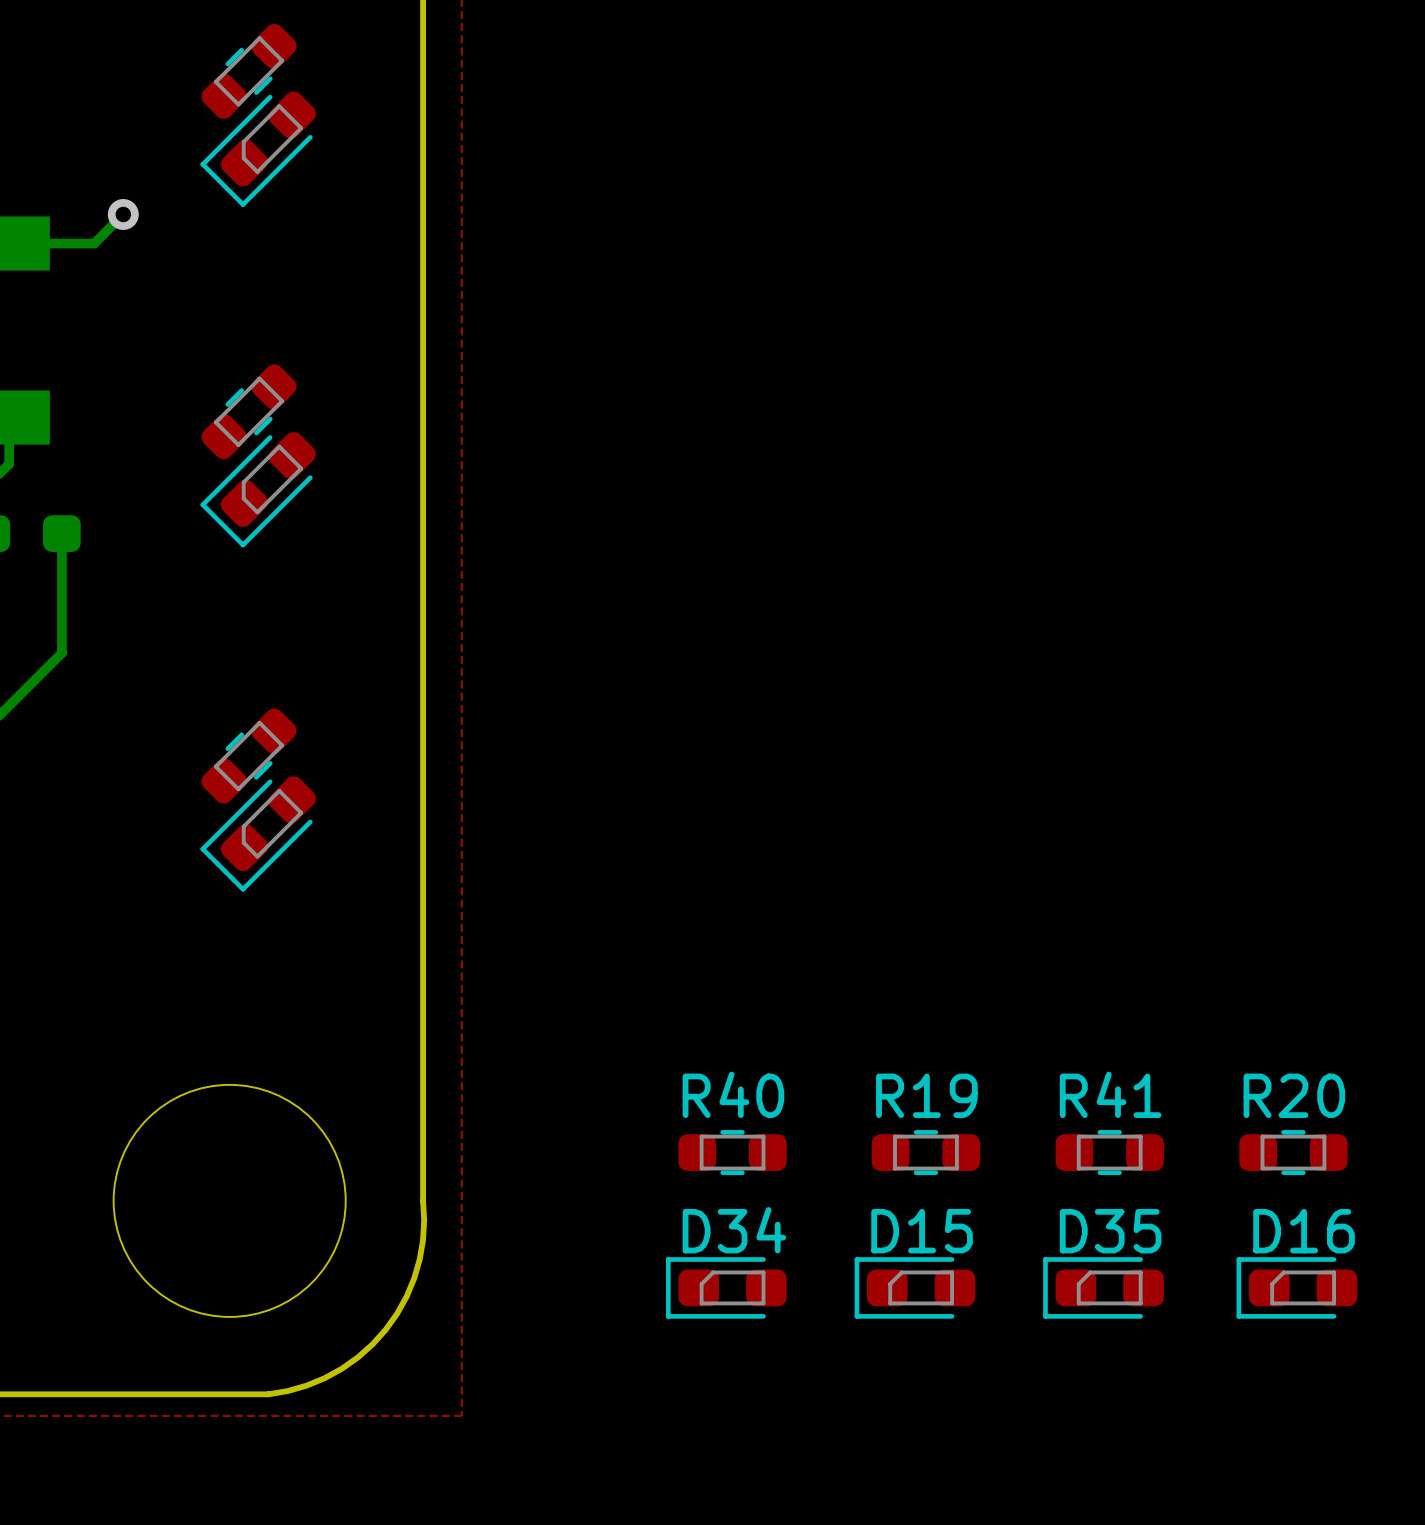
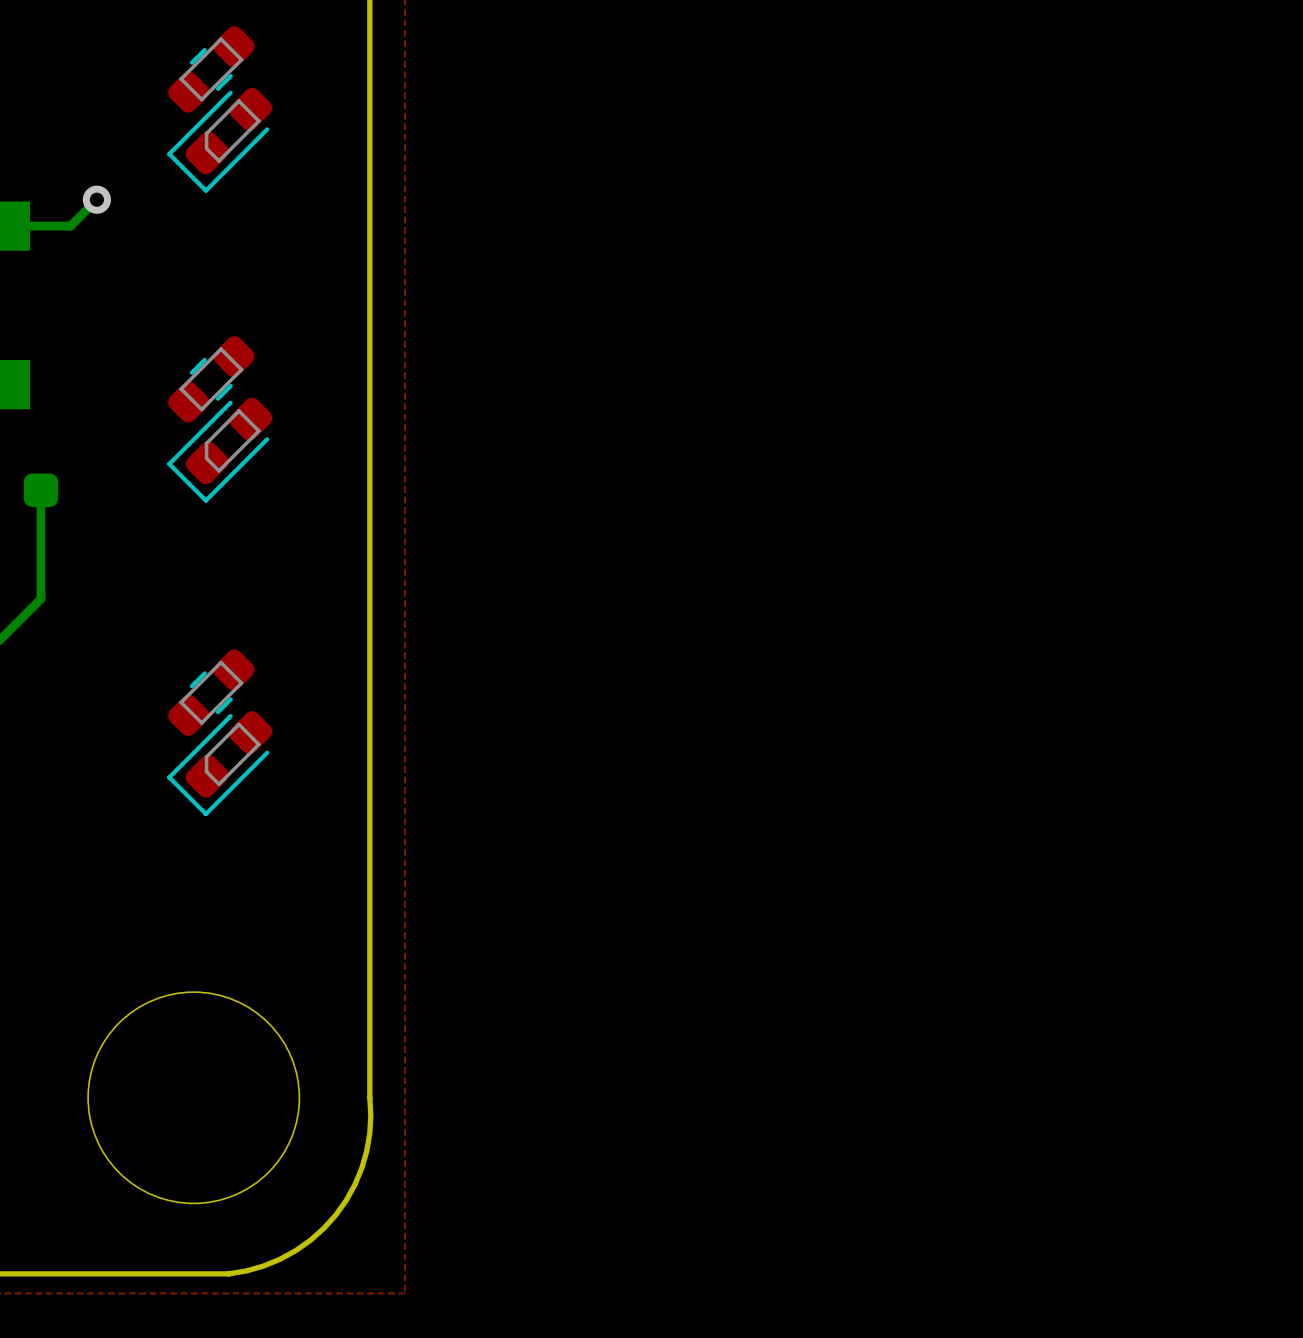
R40: (732, 1152) -> none
R19: (925, 1152) -> none
R41: (1109, 1152) -> none
R20: (1293, 1152) -> none
D34: (726, 1287) -> none
D15: (914, 1287) -> none
D35: (1103, 1287) -> none
D16: (1296, 1287) -> none

